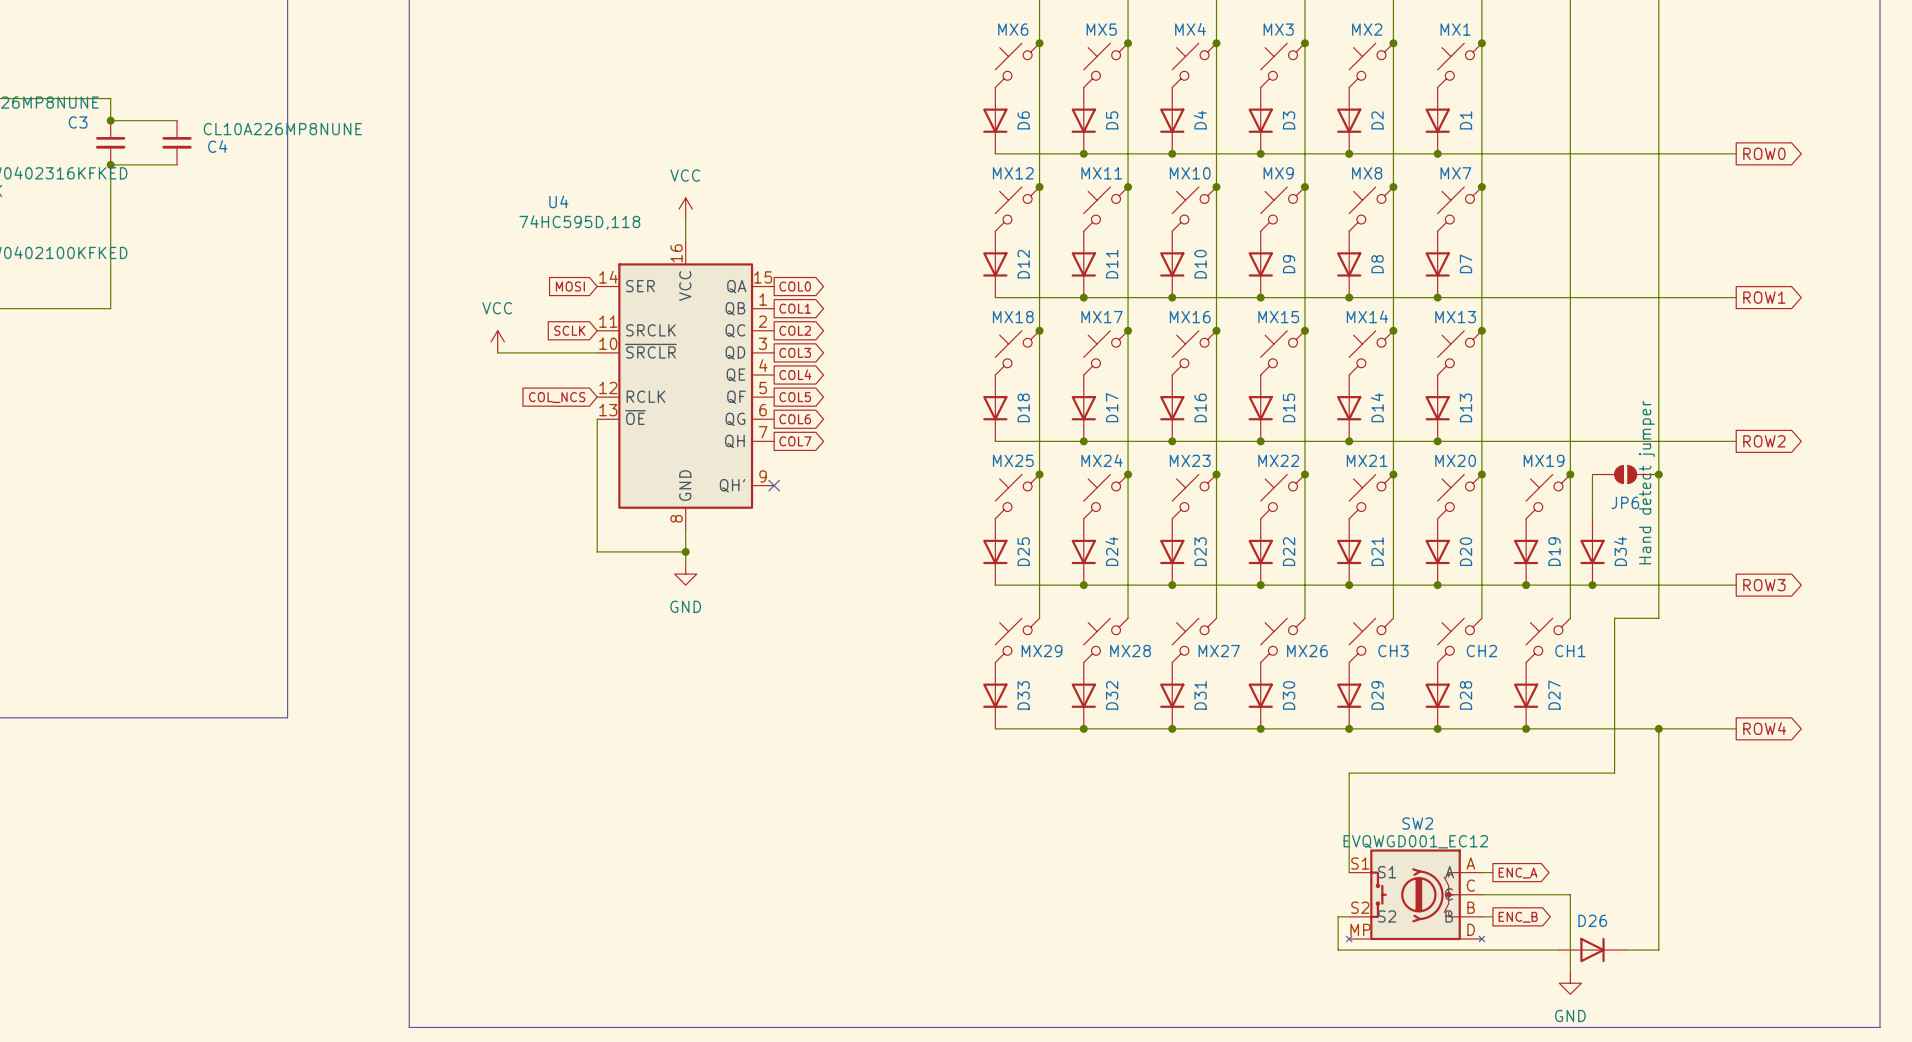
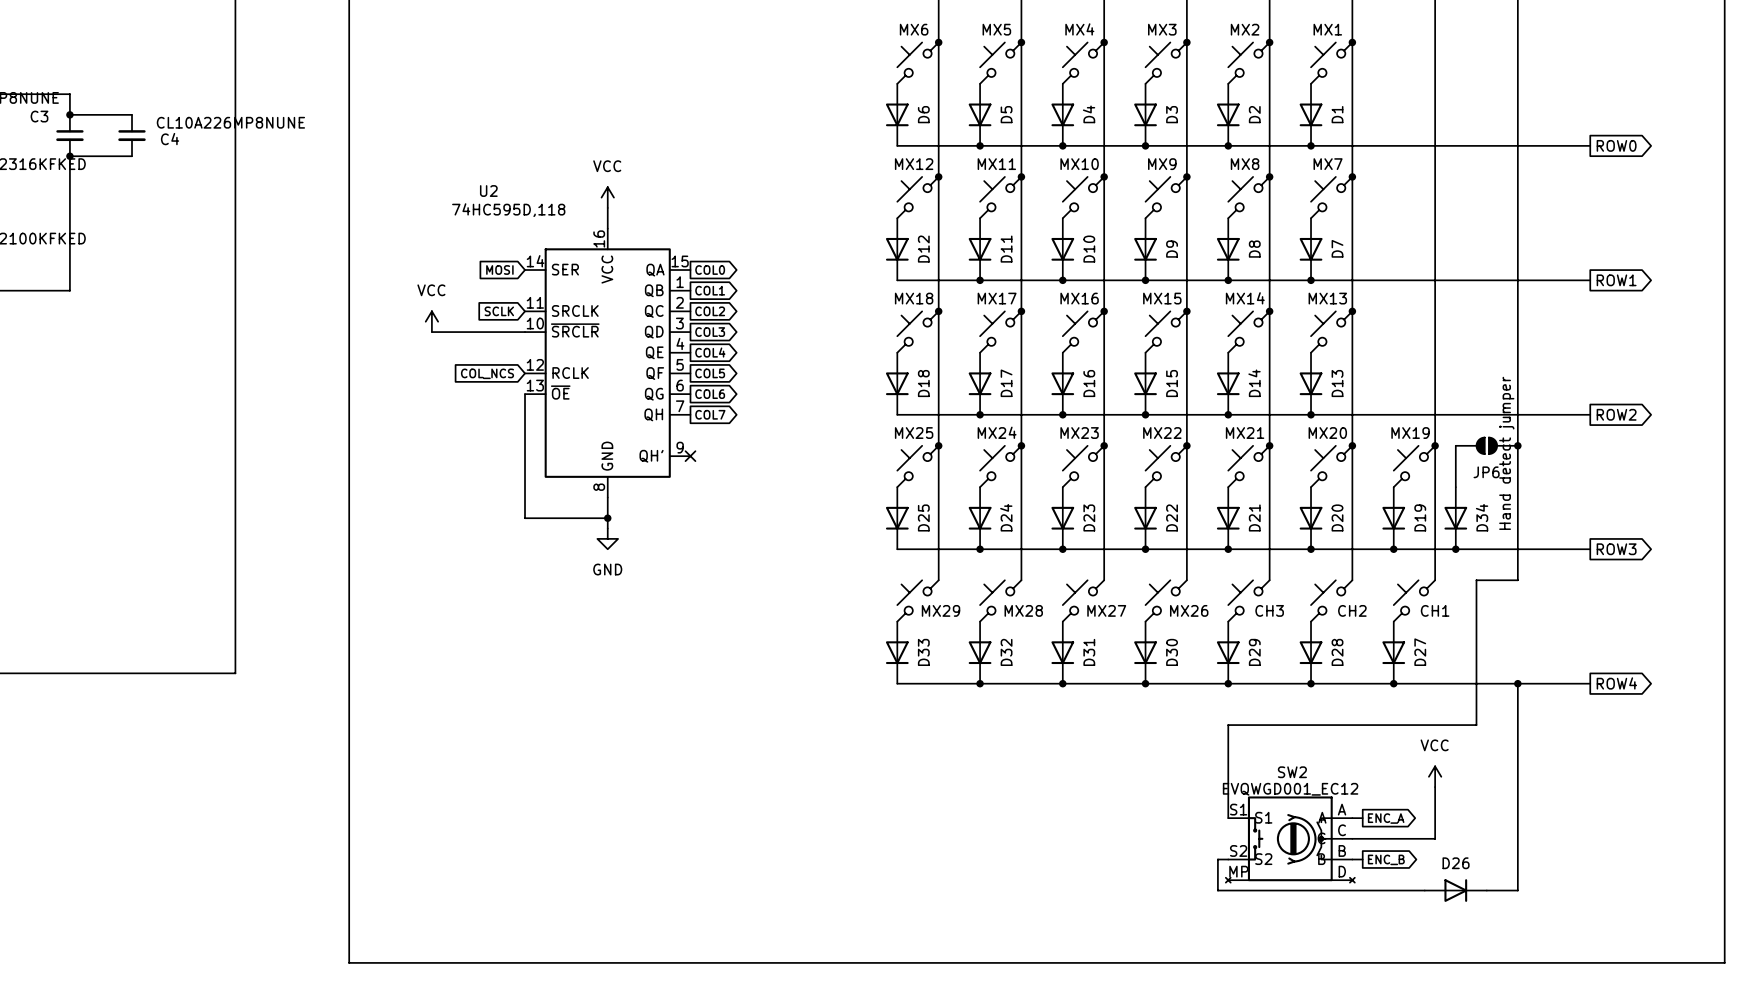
U4 name: U4 (558, 201) -> U2 (488, 191)
power symbol: none -> VCC (1435, 776)
wire: (1570, 894) (1570, 972) -> (1435, 838) (1435, 787)
power symbol: GND (1570, 983) -> none

